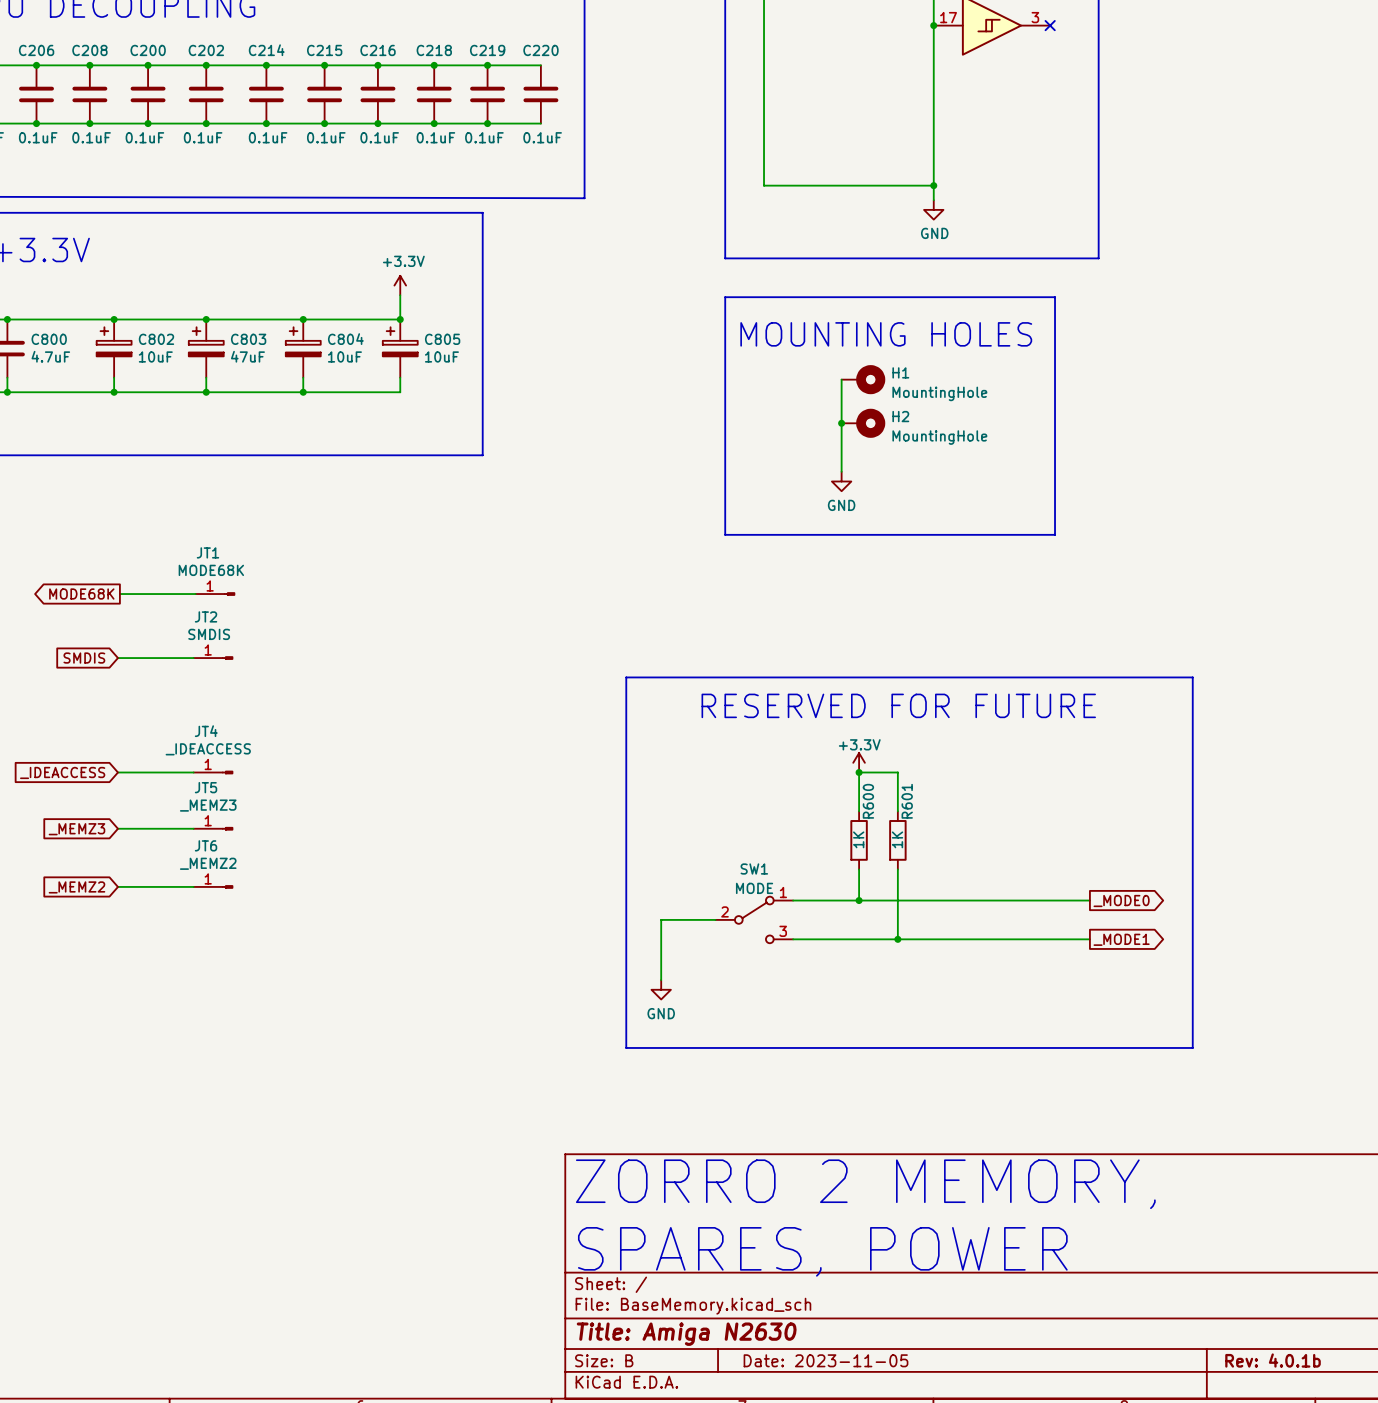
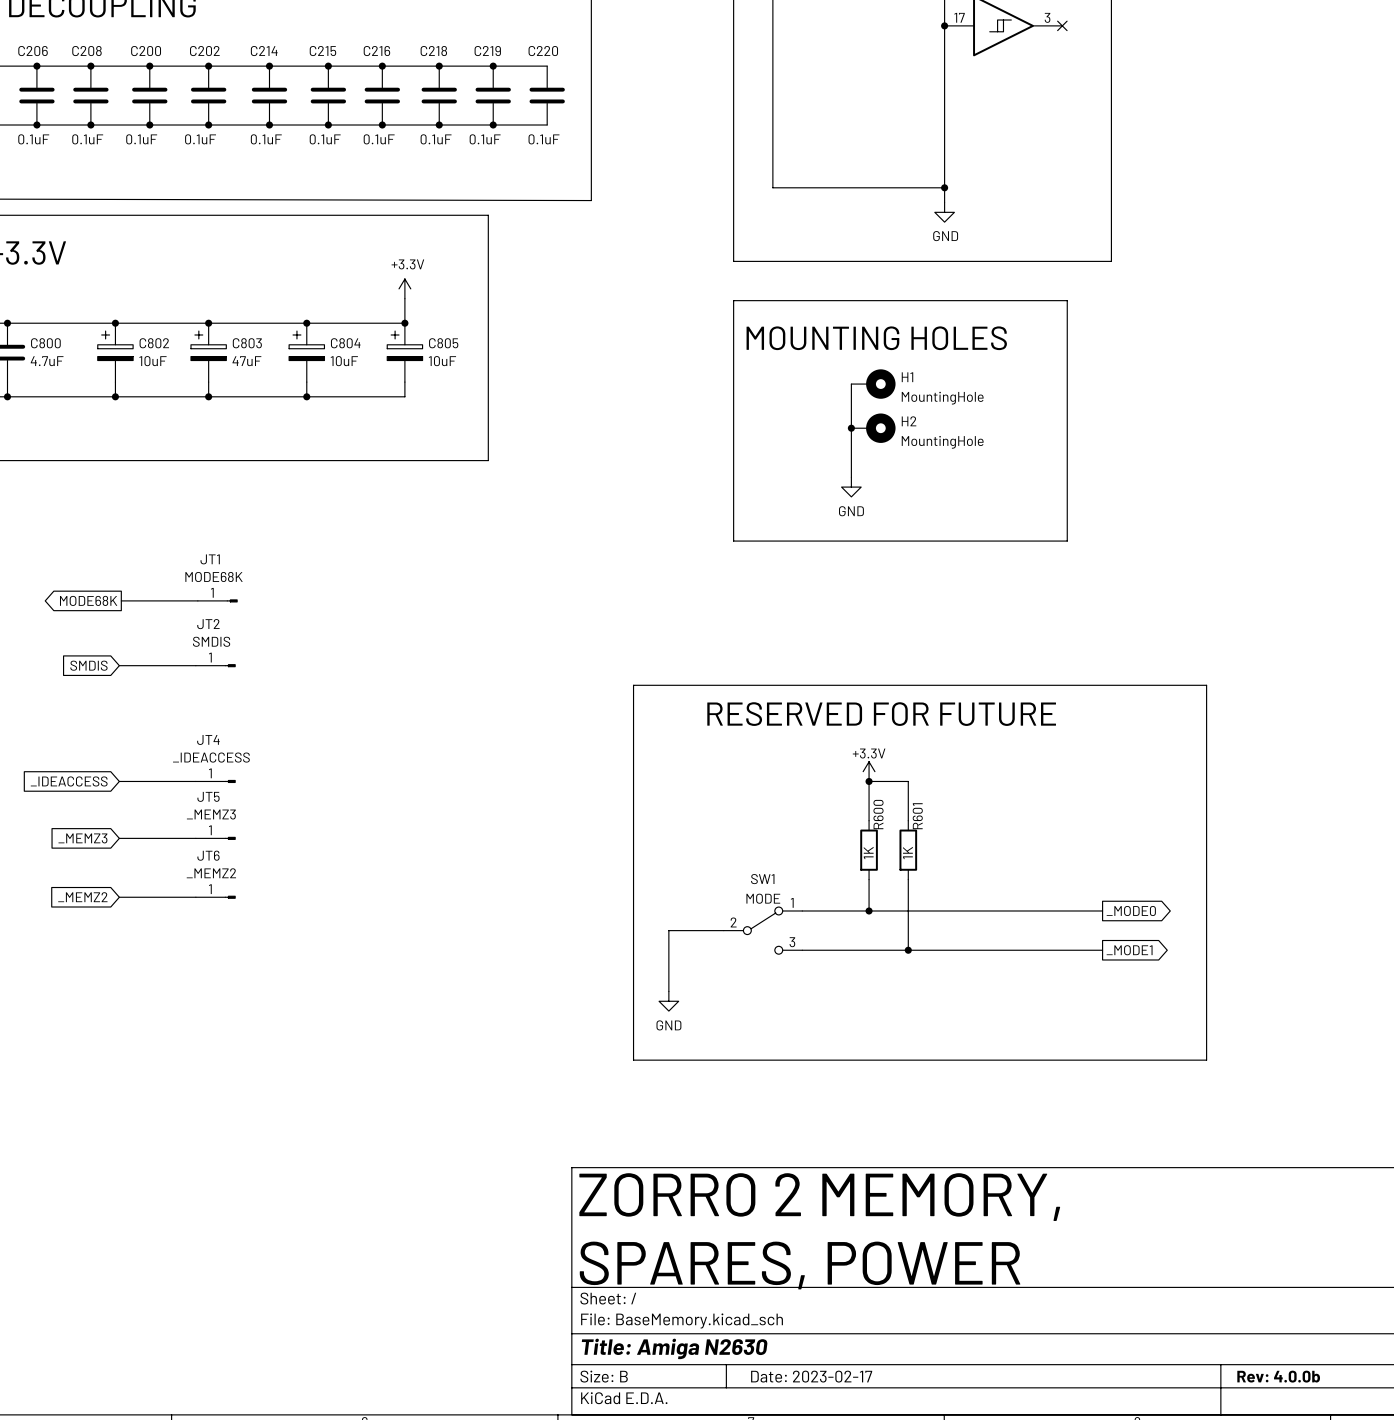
title block: Date: 2023-11-05 (826, 1360) -> Date: 2023-02-17 (811, 1376)
title block: Rev: 4.0.1b (1273, 1360) -> Rev: 4.0.0b (1278, 1376)

